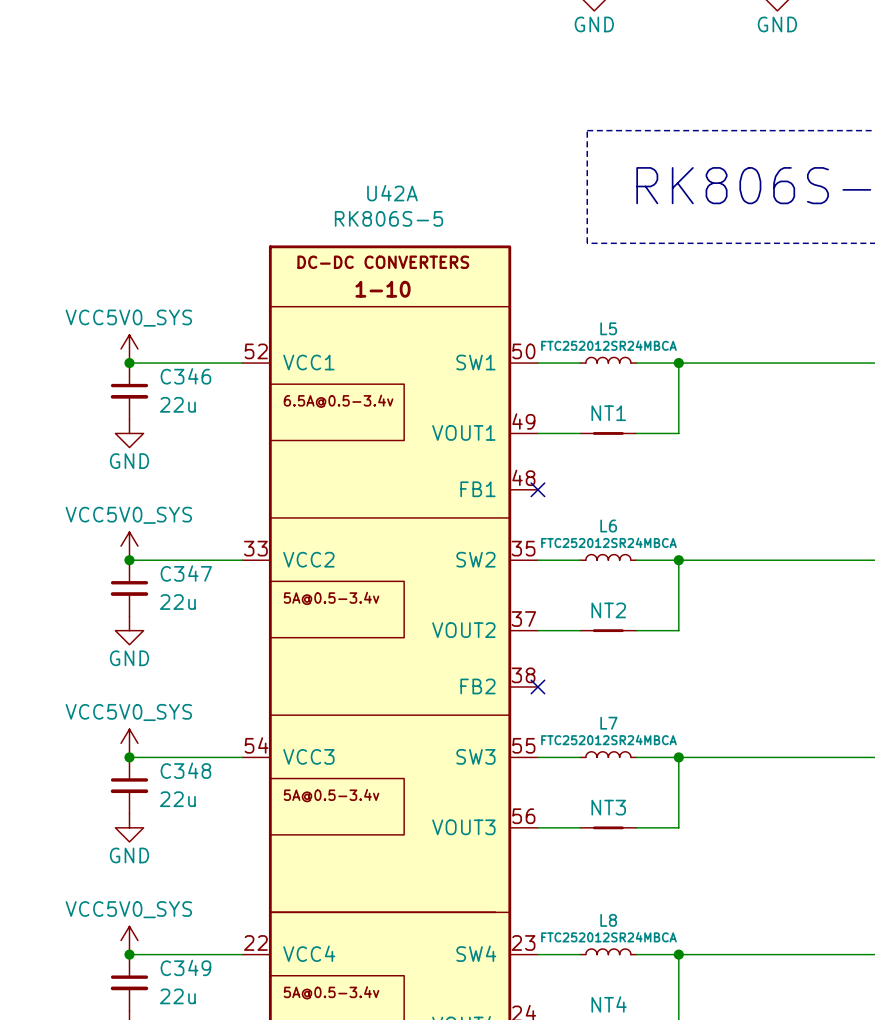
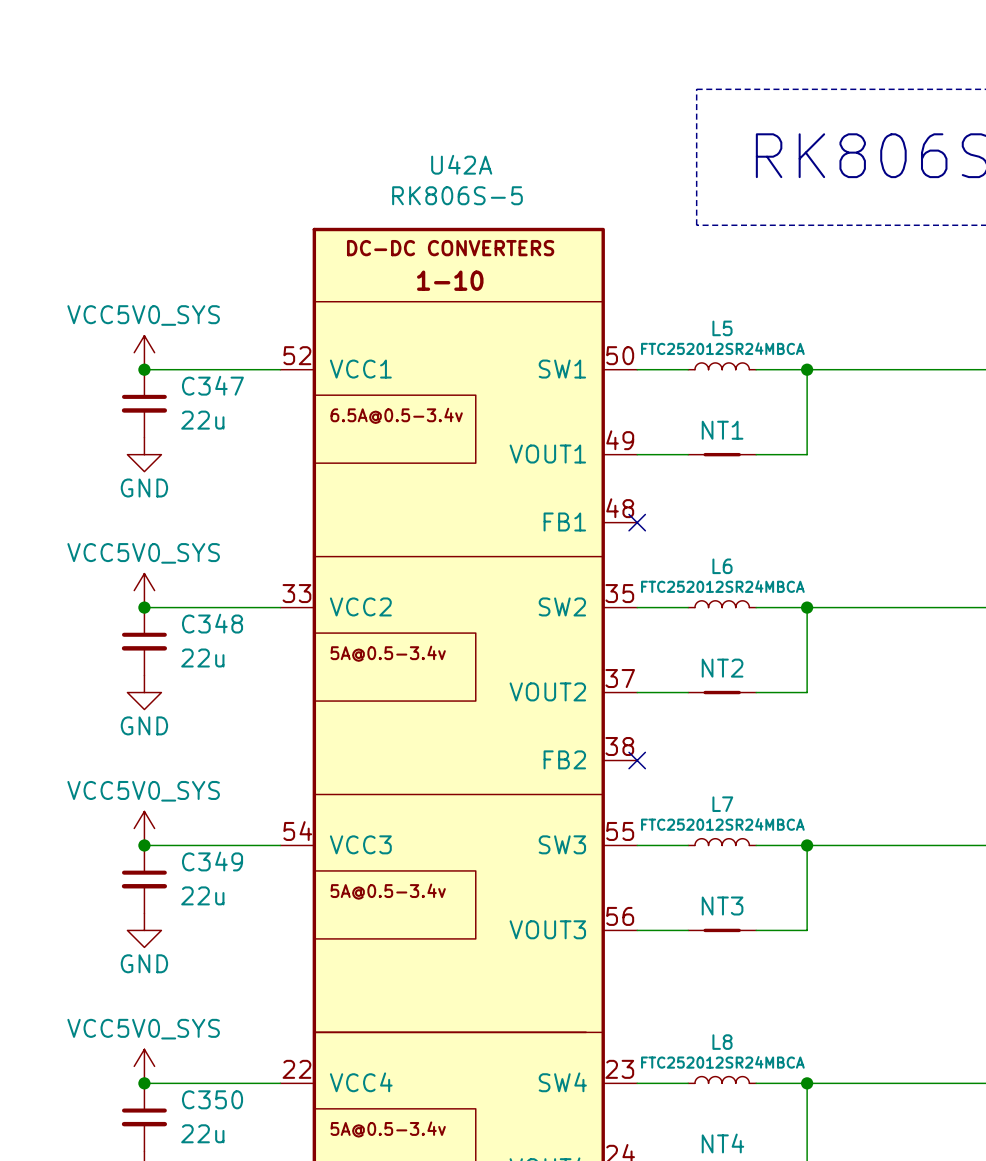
C346 name: C346 (185, 376) -> C347 (212, 385)
C347 name: C347 (186, 573) -> C348 (212, 623)
C348 name: C348 (185, 770) -> C349 (212, 861)
C349 name: C349 (185, 967) -> C350 (212, 1099)

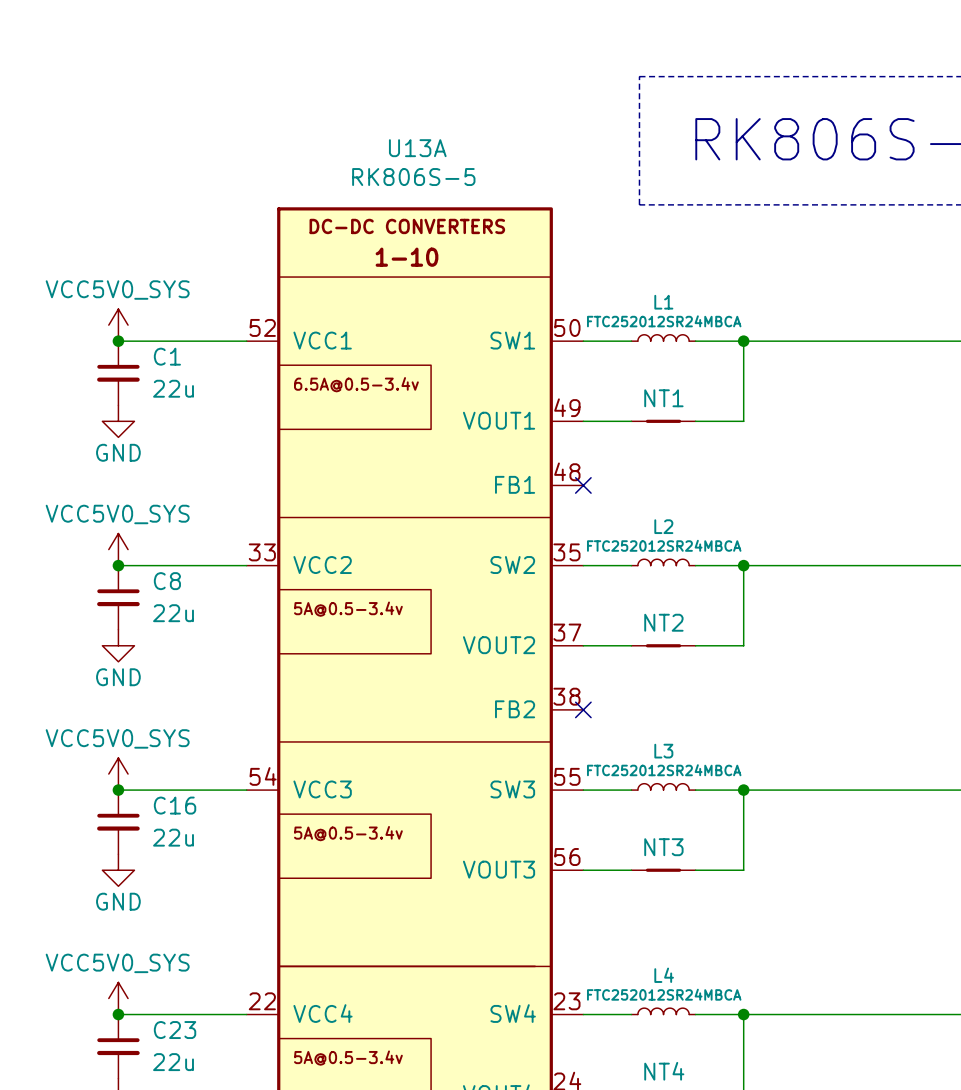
U42A name: U42A (461, 164) -> U13A (417, 148)
L5 name: L5 (722, 328) -> L1 (663, 302)
C347 name: C347 (212, 385) -> C1 (167, 356)
L6 name: L6 (722, 566) -> L2 (663, 526)
C348 name: C348 (212, 623) -> C8 (167, 581)
L7 name: L7 (722, 804) -> L3 (663, 751)
C349 name: C349 (212, 861) -> C16 (175, 805)
L8 name: L8 (722, 1042) -> L4 (664, 975)
C350 name: C350 (212, 1099) -> C23 (175, 1030)

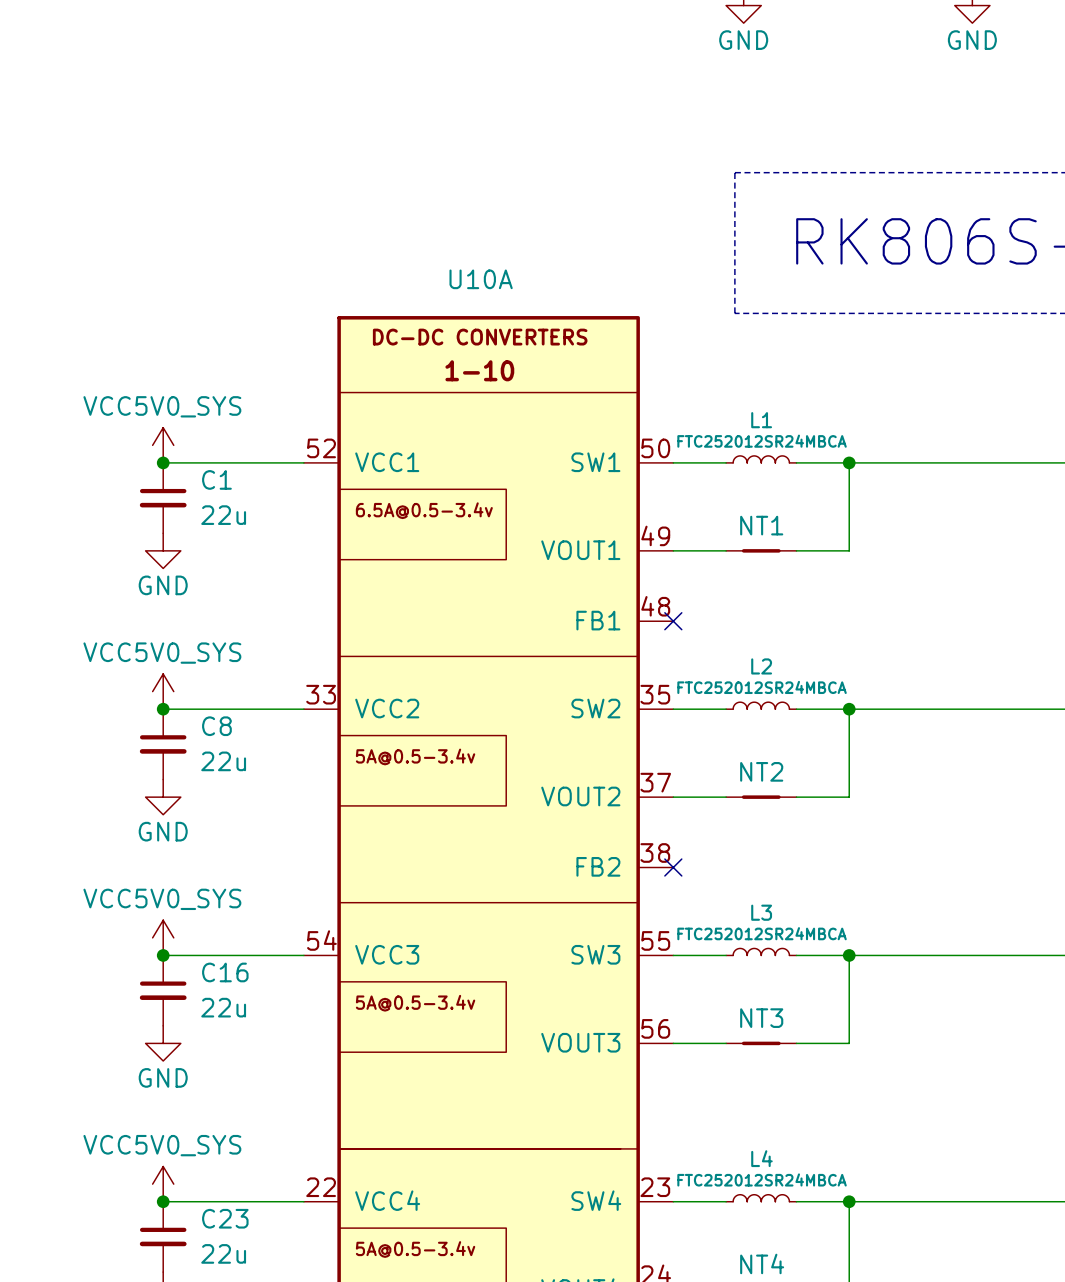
U13A name: U13A (417, 148) -> U10A (481, 279)
U13A value: RK806S-5 (413, 177) -> none

